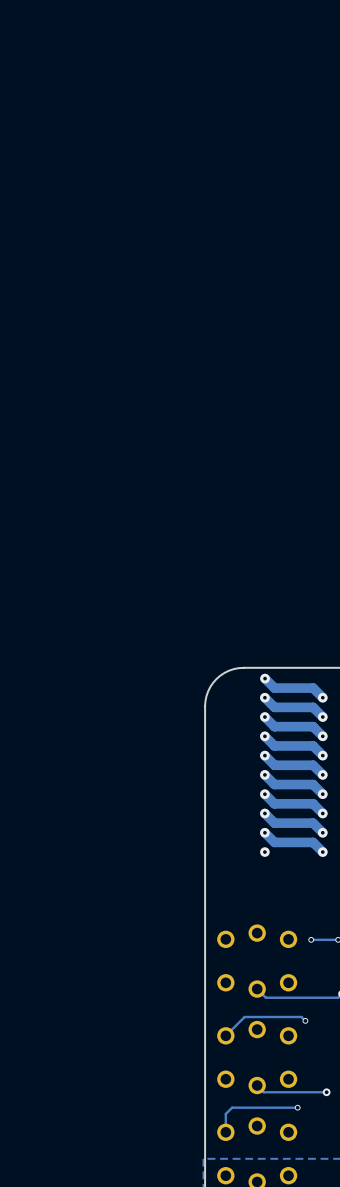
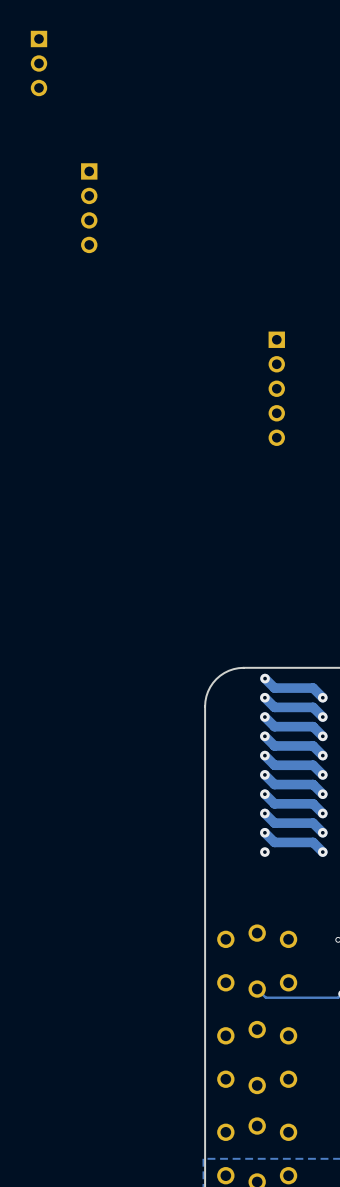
part: none -> (38, 63)
part: none -> (89, 208)
part: none -> (276, 388)
via: (311, 939) -> none
track: (338, 939) (311, 939) -> none
track: (305, 1020) (301, 1017) (244, 1017) (225, 1035) -> none
via: (305, 1020) -> none
track: (257, 1085) (263, 1092) (326, 1092) -> none
via: (326, 1092) -> none
track: (297, 1107) (232, 1107) (225, 1113) (225, 1132) -> none
via: (297, 1107) -> none

